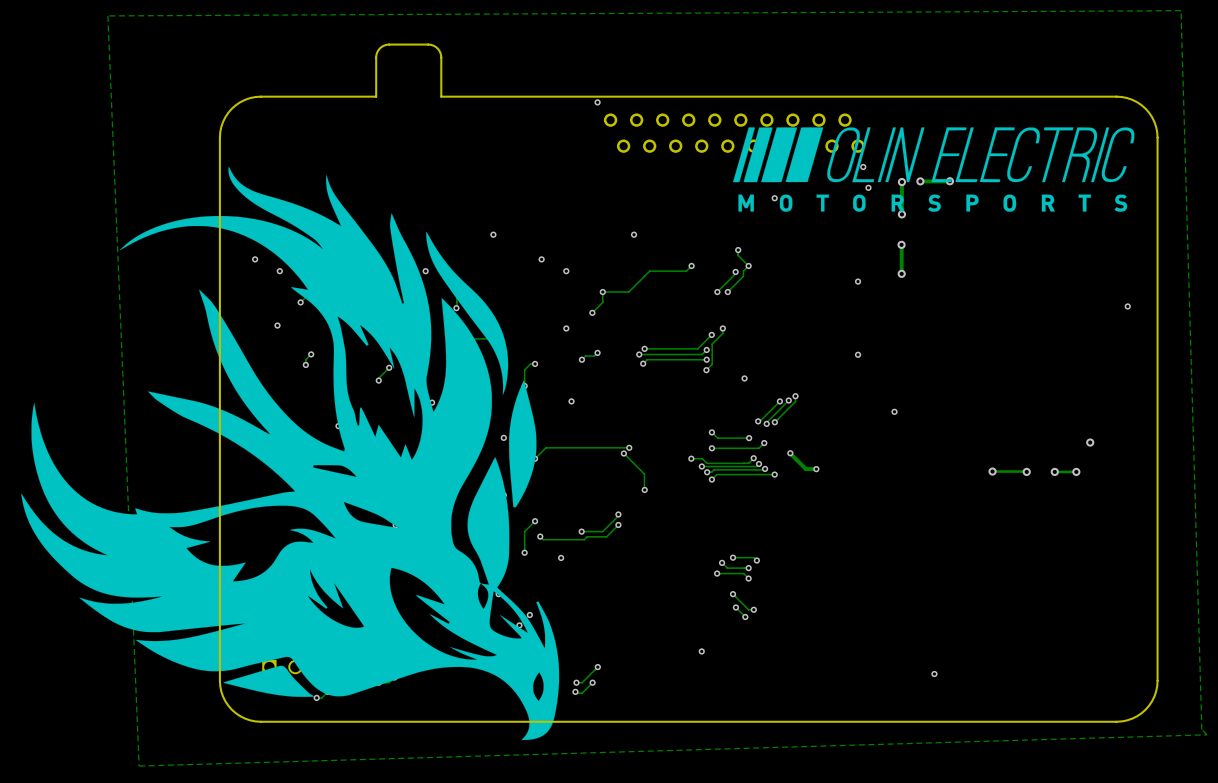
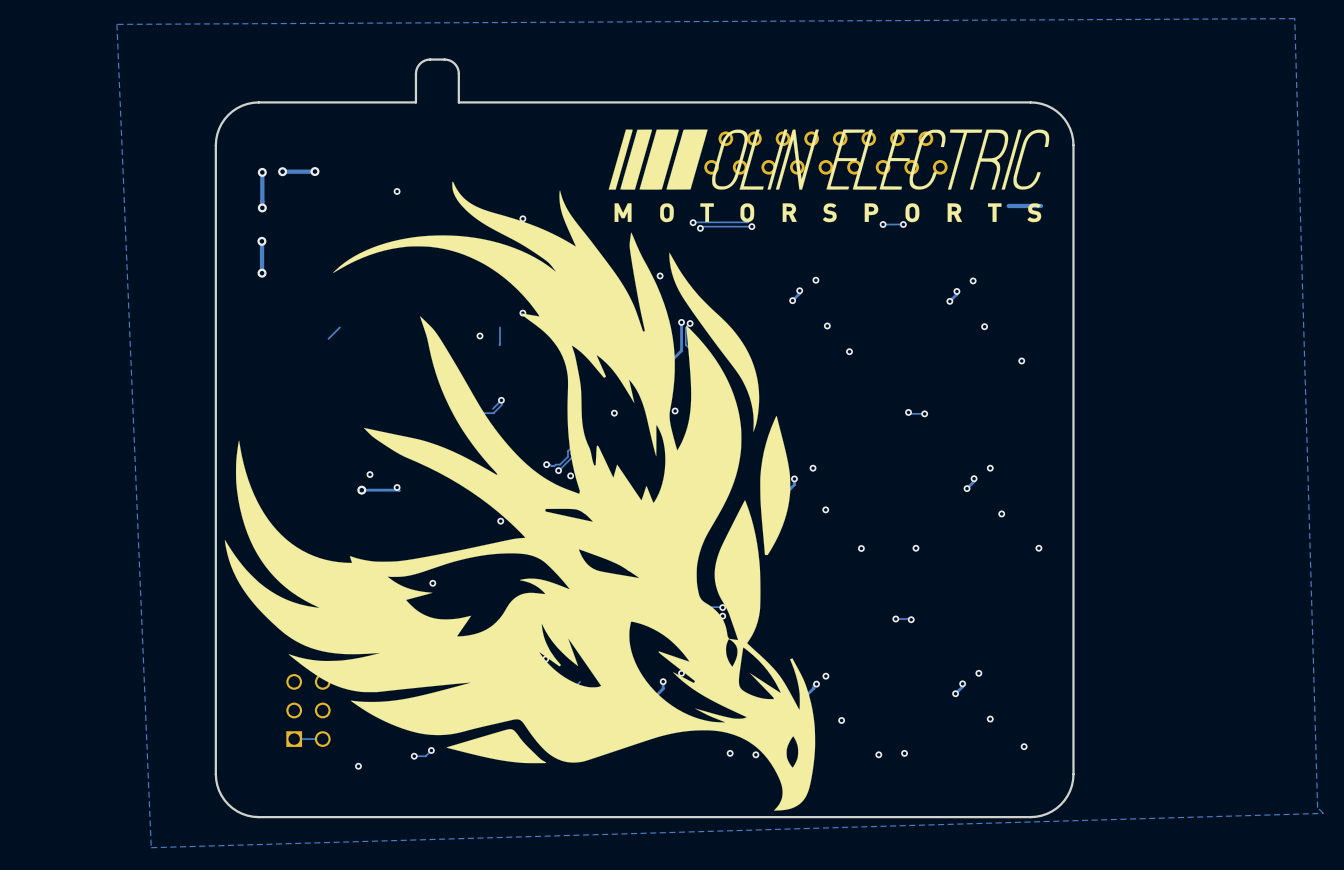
board edge: (428, 44) (387, 44) (379, 48) (376, 55) (376, 96) (255, 97) (235, 105) (225, 117) (221, 127) (219, 680) (223, 696) (231, 709) (245, 718) (260, 721) (1116, 721) (1132, 718) (1145, 709) (1154, 696) (1157, 680) (1157, 137) (1154, 121) (1145, 108) (1132, 99) (1116, 96) (441, 96) (440, 54) (436, 47) (428, 44) -> (444, 59) (453, 62) (458, 70) (458, 102) (1030, 102) (1047, 105) (1064, 119) (1072, 134) (1073, 145) (1073, 774) (1070, 790) (1056, 808) (1041, 815) (1030, 817) (258, 817) (237, 811) (224, 800) (217, 785) (215, 774) (217, 134) (228, 114) (242, 105) (253, 102) (415, 102) (415, 73) (417, 66) (426, 60) (444, 59)
via: (597, 102) -> none
track: none -> (262, 172) (262, 207)
via: none -> (262, 172)
via: none -> (282, 171)
track: none -> (314, 171) (282, 171)
via: none -> (314, 171)
via: (863, 166) -> none
via: none -> (397, 191)
drawing position: (933, 169) -> (828, 175)
via: (920, 181) -> none
via: (949, 181) -> none
track: (901, 182) (901, 214) -> none
via: (901, 182) -> none
via: none -> (262, 207)
via: (868, 187) -> none
track: none -> (751, 218) (747, 222) (693, 222)
via: none -> (522, 218)
via: none -> (693, 222)
via: (774, 198) -> none
via: none -> (883, 224)
track: none -> (903, 224) (883, 224)
via: none -> (903, 224)
track: none -> (751, 226) (702, 226) (700, 228)
via: none -> (751, 226)
via: none -> (700, 228)
via: none -> (261, 241)
track: none -> (262, 241) (262, 273)
via: (901, 214) -> none
via: (493, 234) -> none
via: (634, 234) -> none
via: none -> (262, 273)
track: (901, 244) (901, 273) -> none
via: (901, 244) -> none
via: none -> (660, 275)
via: none -> (815, 280)
via: none -> (973, 280)
track: (738, 250) (738, 255) (748, 265) (743, 271) (743, 276) (727, 292) -> none
via: (738, 250) -> none
track: none -> (799, 290) (799, 293) (792, 300)
via: none -> (799, 290)
via: (255, 259) -> none
via: (541, 259) -> none
track: none -> (956, 291) (956, 294) (949, 301)
via: none -> (956, 291)
track: (691, 265) (686, 271) (649, 271) (628, 292) (602, 292) (602, 302) (592, 312) -> none
via: (691, 265) -> none
via: (748, 265) -> none
via: none -> (792, 300)
via: none -> (949, 301)
via: (279, 271) -> none
via: (425, 271) -> none
via: (566, 271) -> none
track: (735, 271) (717, 292) -> none
via: (735, 271) -> none
via: (901, 273) -> none
via: none -> (522, 313)
via: (858, 281) -> none
track: none -> (681, 322) (681, 350) (671, 360)
via: none -> (681, 322)
track: none -> (690, 323) (685, 327) (685, 344) (688, 347)
via: none -> (690, 323)
via: none -> (827, 325)
via: none -> (984, 326)
via: (602, 292) -> none
via: (717, 292) -> none
via: (727, 292) -> none
via: none -> (480, 335)
via: (300, 302) -> none
via: (1127, 306) -> none
via: (456, 308) -> none
via: (592, 312) -> none
via: none -> (849, 351)
via: none -> (1021, 361)
via: (277, 325) -> none
via: (566, 328) -> none
track: (722, 328) (722, 333) (712, 344) (712, 364) (706, 370) -> none
via: (722, 328) -> none
track: (711, 334) (697, 348) (644, 348) -> none
via: (711, 334) -> none
track: (467, 338) (493, 338) -> none
via: (644, 348) -> none
track: (706, 349) (702, 354) (639, 354) -> none
via: (706, 349) -> none
track: (597, 352) (594, 356) (585, 356) (581, 359) -> none
track: (311, 354) (305, 359) (305, 364) -> none
via: (311, 354) -> none
via: (858, 354) -> none
via: (581, 359) -> none
track: (706, 359) (647, 359) (643, 363) -> none
via: (706, 359) -> none
track: none -> (502, 404) (493, 413) (480, 413)
track: (535, 363) (530, 363) (524, 369) (524, 386) -> none
via: (535, 363) -> none
via: (305, 364) -> none
track: (389, 367) (378, 380) -> none
via: (389, 367) -> none
via: none -> (675, 411)
track: none -> (908, 412) (924, 413)
via: none -> (908, 412)
via: none -> (614, 413)
via: (706, 370) -> none
via: none -> (924, 413)
via: (744, 378) -> none
via: (378, 380) -> none
track: none -> (570, 442) (567, 456) (560, 464) (546, 464)
track: (795, 396) (795, 401) (774, 422) -> none
via: (795, 396) -> none
track: (788, 400) (766, 423) -> none
via: (788, 400) -> none
via: (571, 401) -> none
track: (779, 401) (758, 421) -> none
via: (779, 401) -> none
via: (432, 402) -> none
track: none -> (574, 453) (558, 470)
via: (894, 411) -> none
via: none -> (546, 464)
via: none -> (813, 468)
via: none -> (990, 468)
via: (758, 421) -> none
via: none -> (558, 470)
via: (774, 422) -> none
via: (766, 423) -> none
via: none -> (570, 475)
track: none -> (974, 478) (974, 481) (967, 488)
via: none -> (974, 478)
track: none -> (794, 478) (794, 484) (788, 490)
via: none -> (794, 478)
track: (711, 432) (717, 438) (749, 438) -> none
via: (711, 432) -> none
via: (503, 437) -> none
via: (749, 438) -> none
via: none -> (967, 488)
track: none -> (361, 490) (399, 490)
via: none -> (361, 490)
via: (1090, 442) -> none
track: (764, 443) (759, 448) (711, 448) -> none
via: (764, 443) -> none
track: (629, 447) (545, 447) (529, 463) (528, 469) -> none
via: (629, 447) -> none
via: (711, 448) -> none
drawing position: (290, 453) -> (520, 496)
track: (623, 453) (644, 474) (644, 489) -> none
via: (623, 453) -> none
track: (790, 453) (805, 469) (816, 469) -> none
via: (790, 453) -> none
track: (691, 458) (702, 458) (706, 463) (743, 463) -> none
via: (691, 458) -> none
track: (753, 458) (748, 463) (744, 463) -> none
via: none -> (1001, 513)
track: (759, 463) (756, 466) (701, 466) -> none
via: (759, 463) -> none
via: (701, 466) -> none
via: none -> (500, 521)
track: (765, 468) (713, 469) (707, 472) -> none
via: (765, 468) -> none
via: (816, 469) -> none
track: (992, 471) (1026, 471) -> none
via: (992, 471) -> none
via: (1026, 471) -> none
via: (1054, 471) -> none
via: (1076, 471) -> none
via: (707, 472) -> none
track: (774, 474) (716, 474) (711, 479) -> none
via: (774, 474) -> none
via: (711, 479) -> none
via: (644, 489) -> none
via: none -> (861, 548)
via: none -> (915, 548)
via: none -> (1038, 548)
track: (618, 514) (602, 531) (581, 531) -> none
via: (618, 514) -> none
track: (535, 521) (524, 531) (524, 552) -> none
via: (535, 521) -> none
track: (618, 525) (606, 536) (587, 536) (584, 539) (543, 539) (540, 536) -> none
via: (618, 525) -> none
via: (581, 531) -> none
via: (540, 536) -> none
track: none -> (707, 607) (722, 607)
via: none -> (722, 607)
via: (524, 552) -> none
via: none -> (722, 616)
via: (561, 557) -> none
track: (733, 557) (754, 557) (756, 560) -> none
via: (733, 557) -> none
track: none -> (895, 619) (911, 619)
via: none -> (895, 619)
via: none -> (911, 619)
via: (756, 560) -> none
track: (722, 562) (727, 568) (748, 568) -> none
via: (722, 562) -> none
via: (748, 568) -> none
track: (717, 573) (743, 573) (748, 578) -> none
via: (717, 573) -> none
via: (748, 578) -> none
track: (733, 594) (748, 609) (753, 609) -> none
via: (733, 594) -> none
via: none -> (681, 673)
track: (735, 607) (745, 616) -> none
via: (735, 607) -> none
via: none -> (978, 673)
via: (529, 614) -> none
track: none -> (663, 681) (663, 688) (658, 693)
via: none -> (663, 681)
track: none -> (962, 683) (962, 686) (955, 693)
via: none -> (962, 683)
track: none -> (813, 685) (813, 688) (806, 695)
via: (519, 625) -> none
via: none -> (955, 693)
via: none -> (990, 719)
via: none -> (841, 720)
via: (701, 651) -> none
track: none -> (320, 734) (316, 739) (301, 739)
track: (597, 667) (582, 682) (576, 682) -> none
via: (597, 667) -> none
via: none -> (730, 753)
via: none -> (904, 753)
via: none -> (755, 754)
via: none -> (878, 754)
via: (576, 682) -> none
track: (592, 682) (582, 693) (575, 691) -> none
via: (592, 682) -> none
track: (327, 691) (321, 698) (316, 697) -> none
via: (575, 691) -> none
via: (316, 697) -> none

